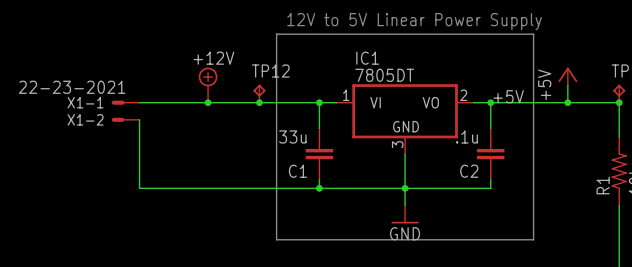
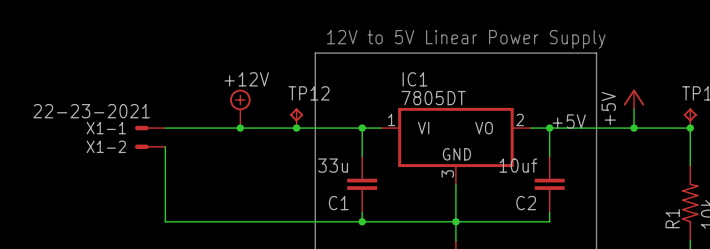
C2 value: .1u (466, 136) -> 10uf (518, 165)

